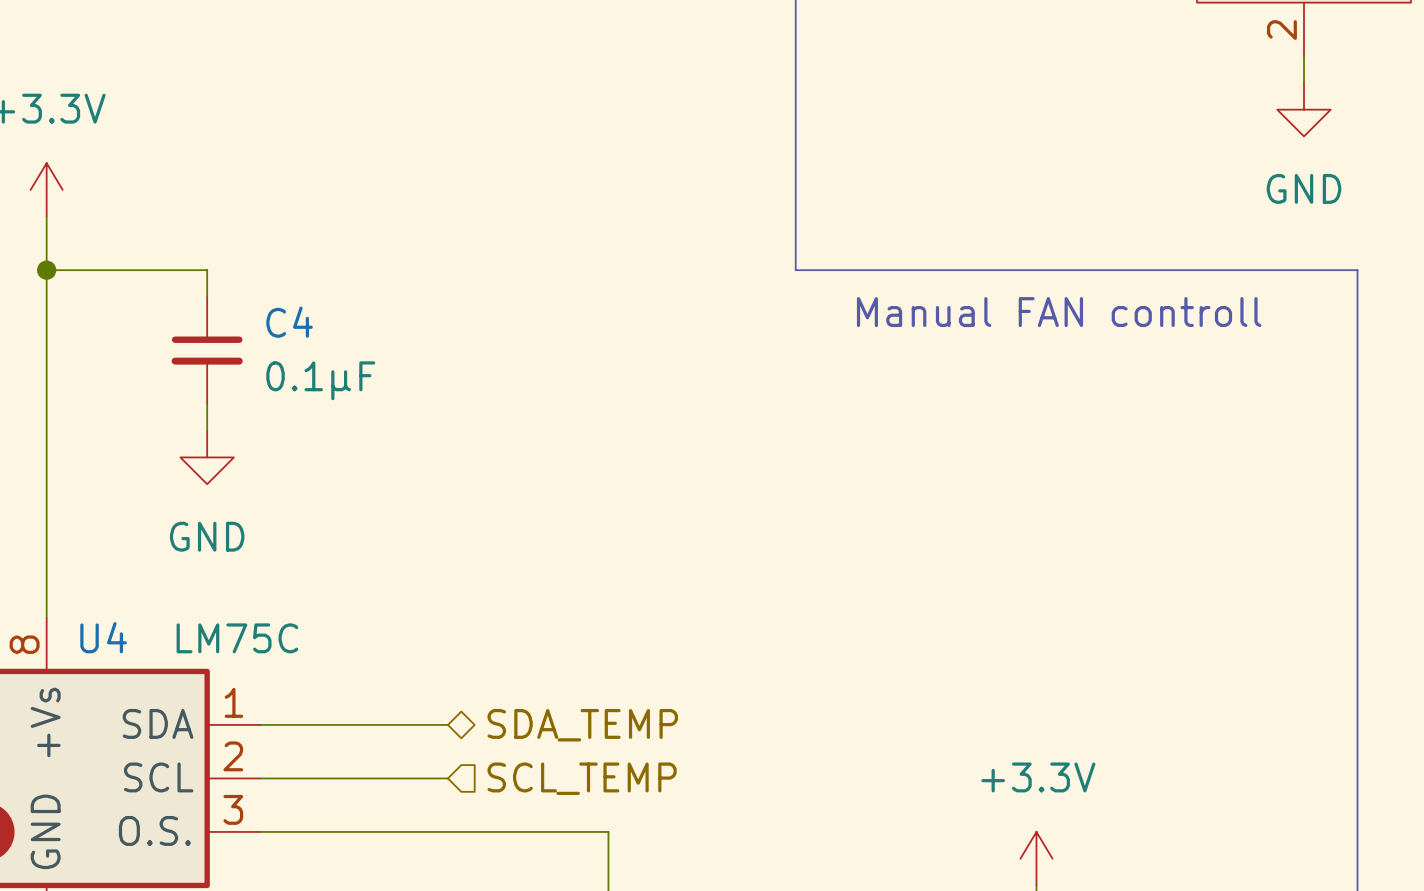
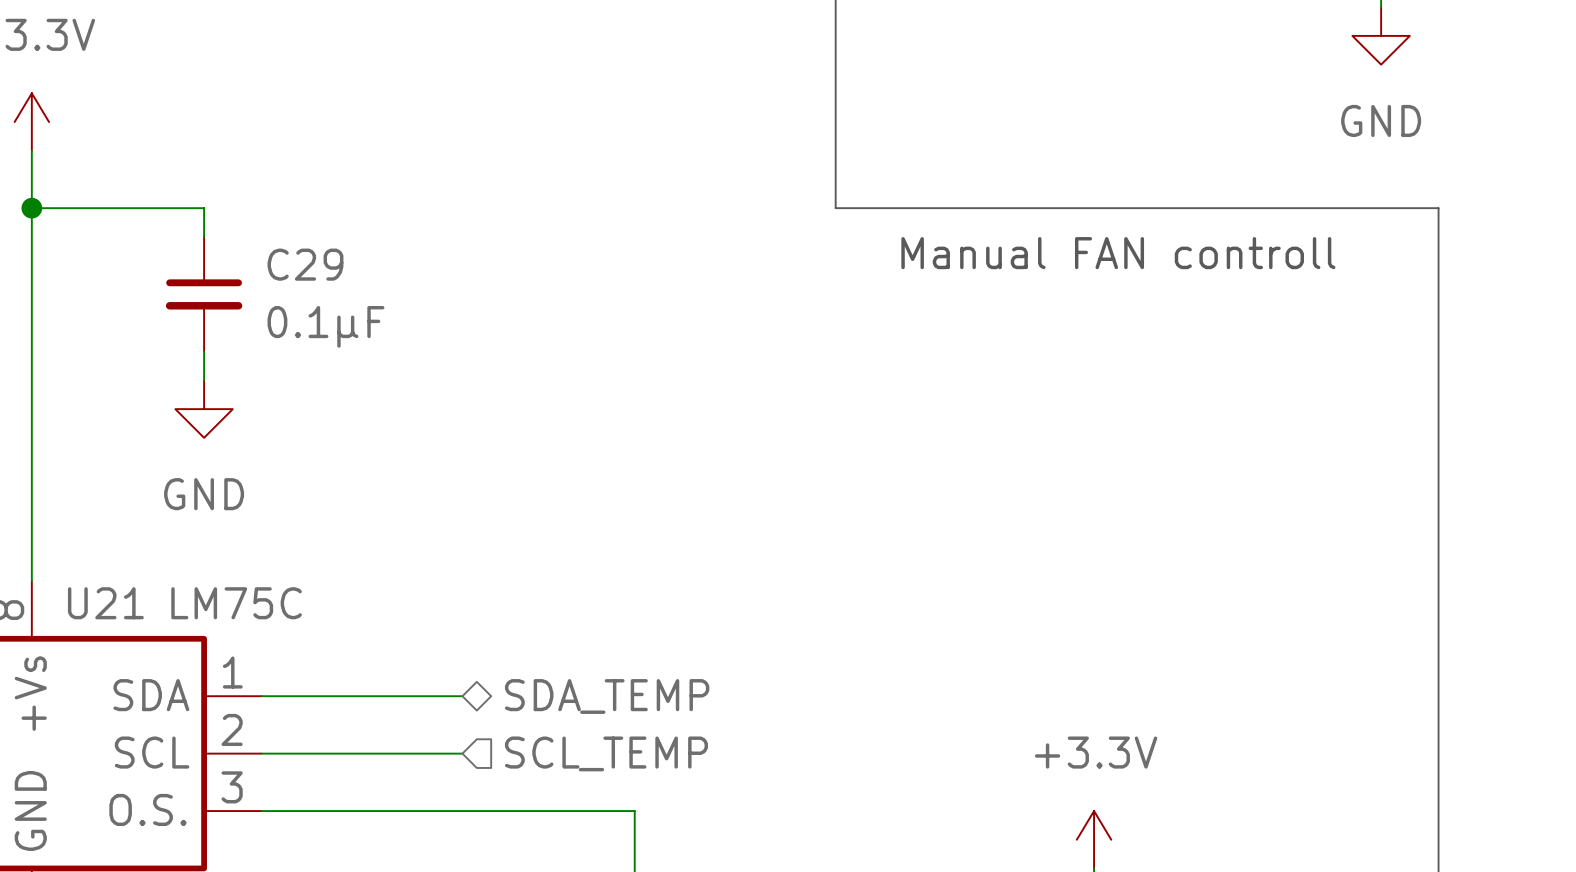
C4 name: C4 (289, 322) -> C29 (305, 264)
U4 name: U4 (103, 637) -> U21 (105, 603)

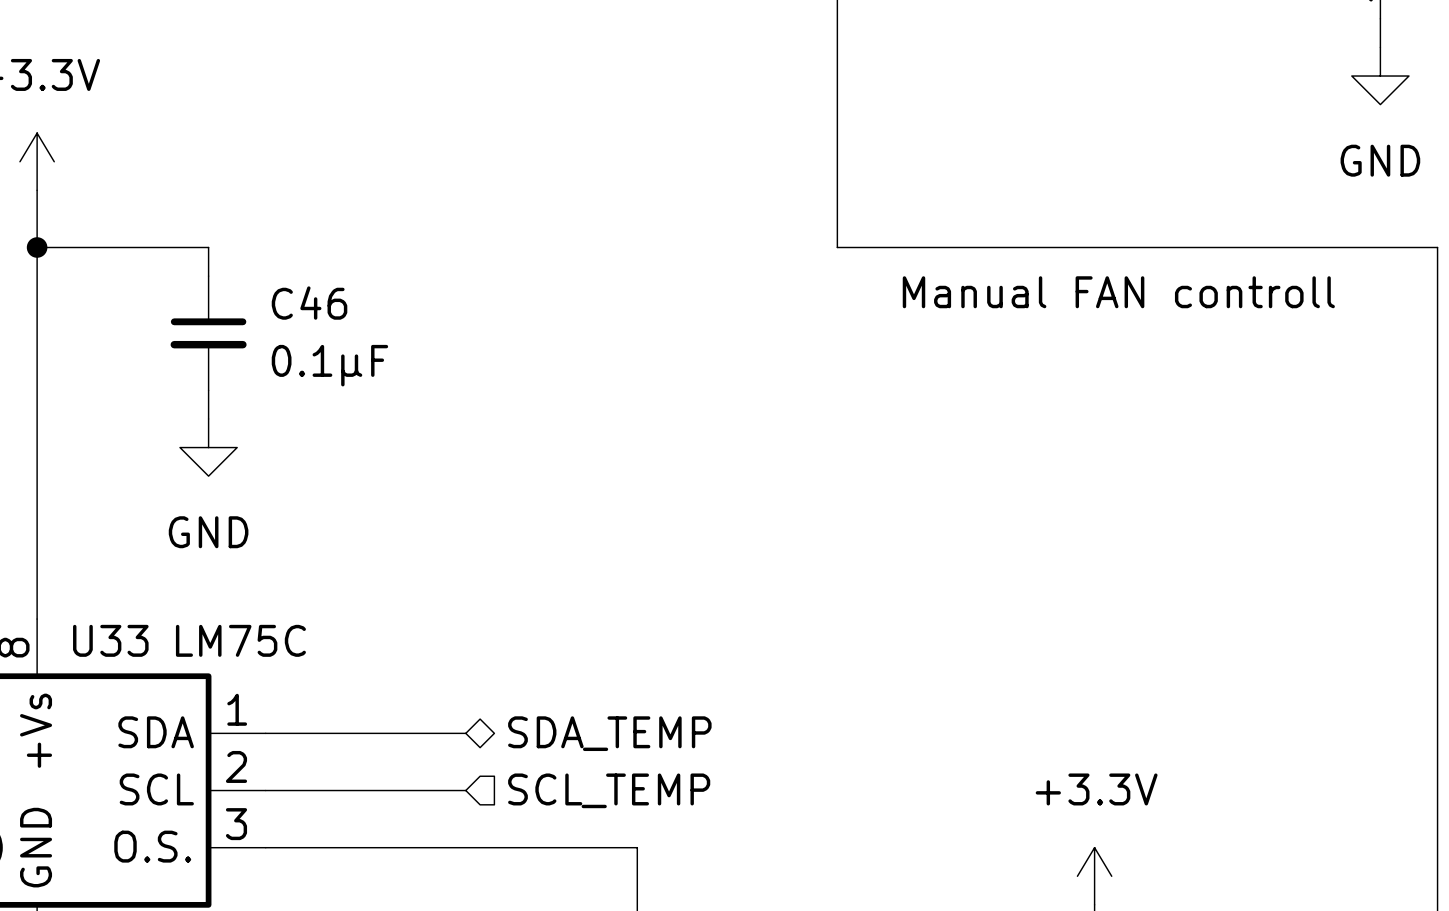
C29 name: C29 (305, 264) -> C46 (309, 303)
U21 name: U21 (105, 603) -> U33 (110, 640)

